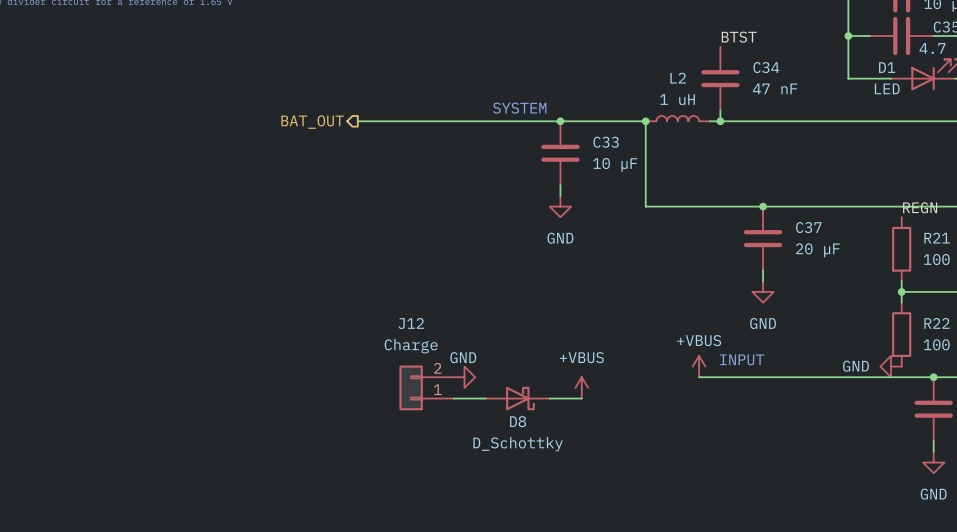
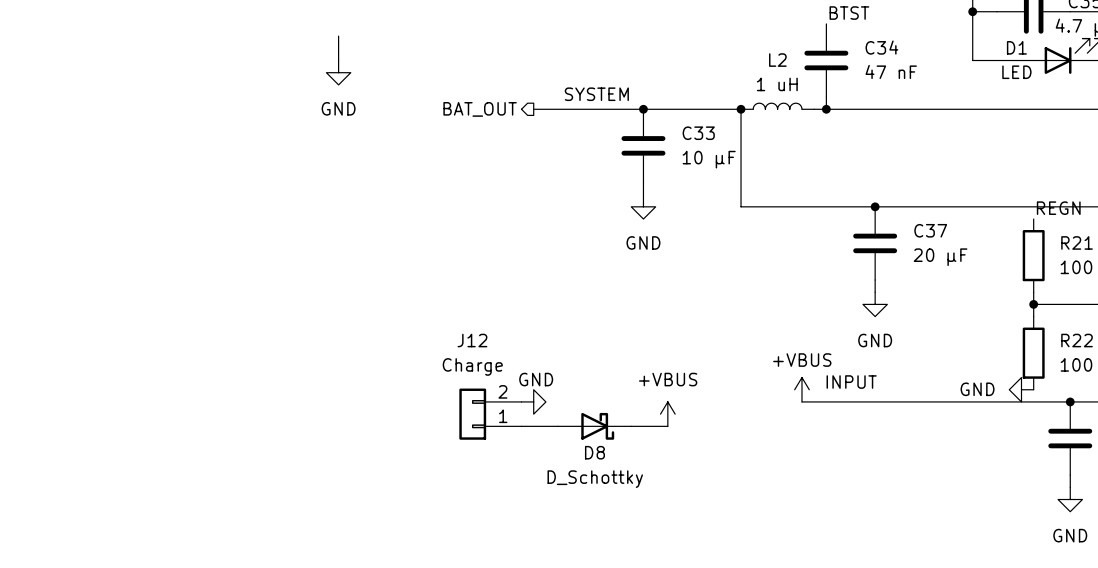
wire: none -> (338, 36) (338, 60)
power symbol: none -> GND (338, 72)
wire: (357, 121) (464, 121) -> none
hierarchical label position: BAT_OUT (312, 122) -> BAT_OUT (480, 109)

